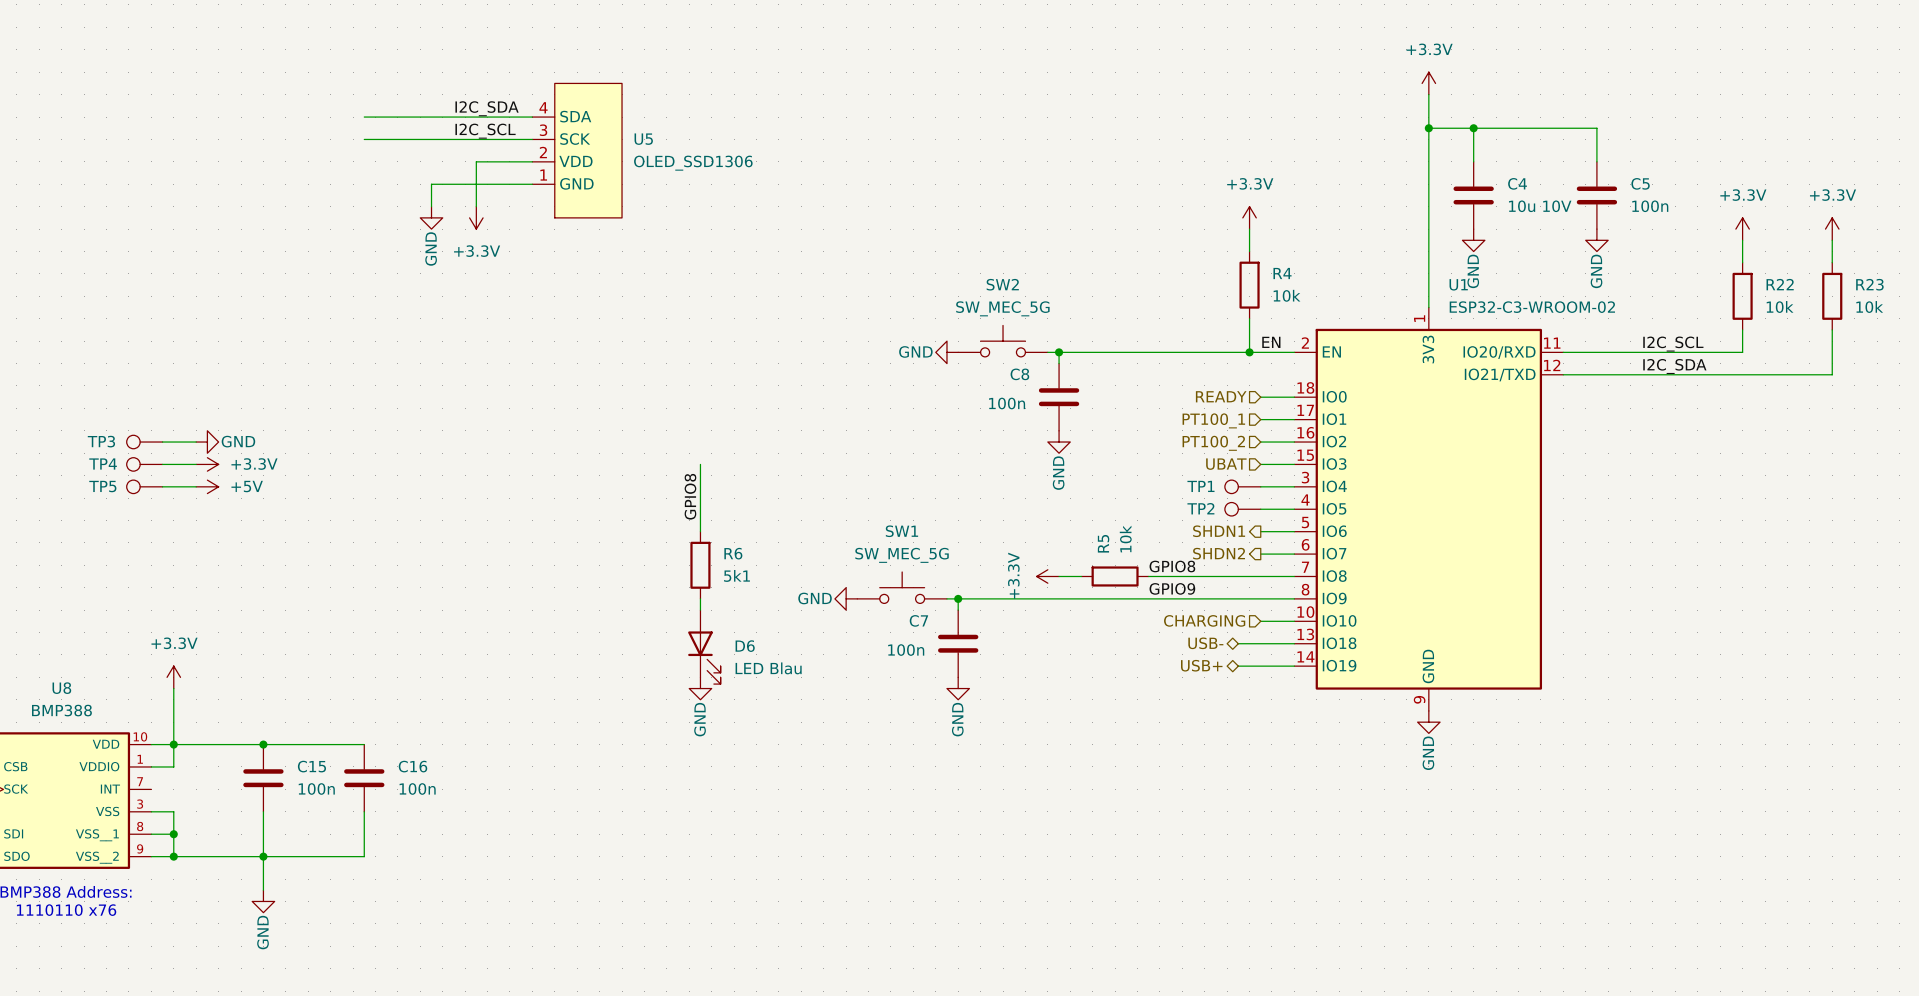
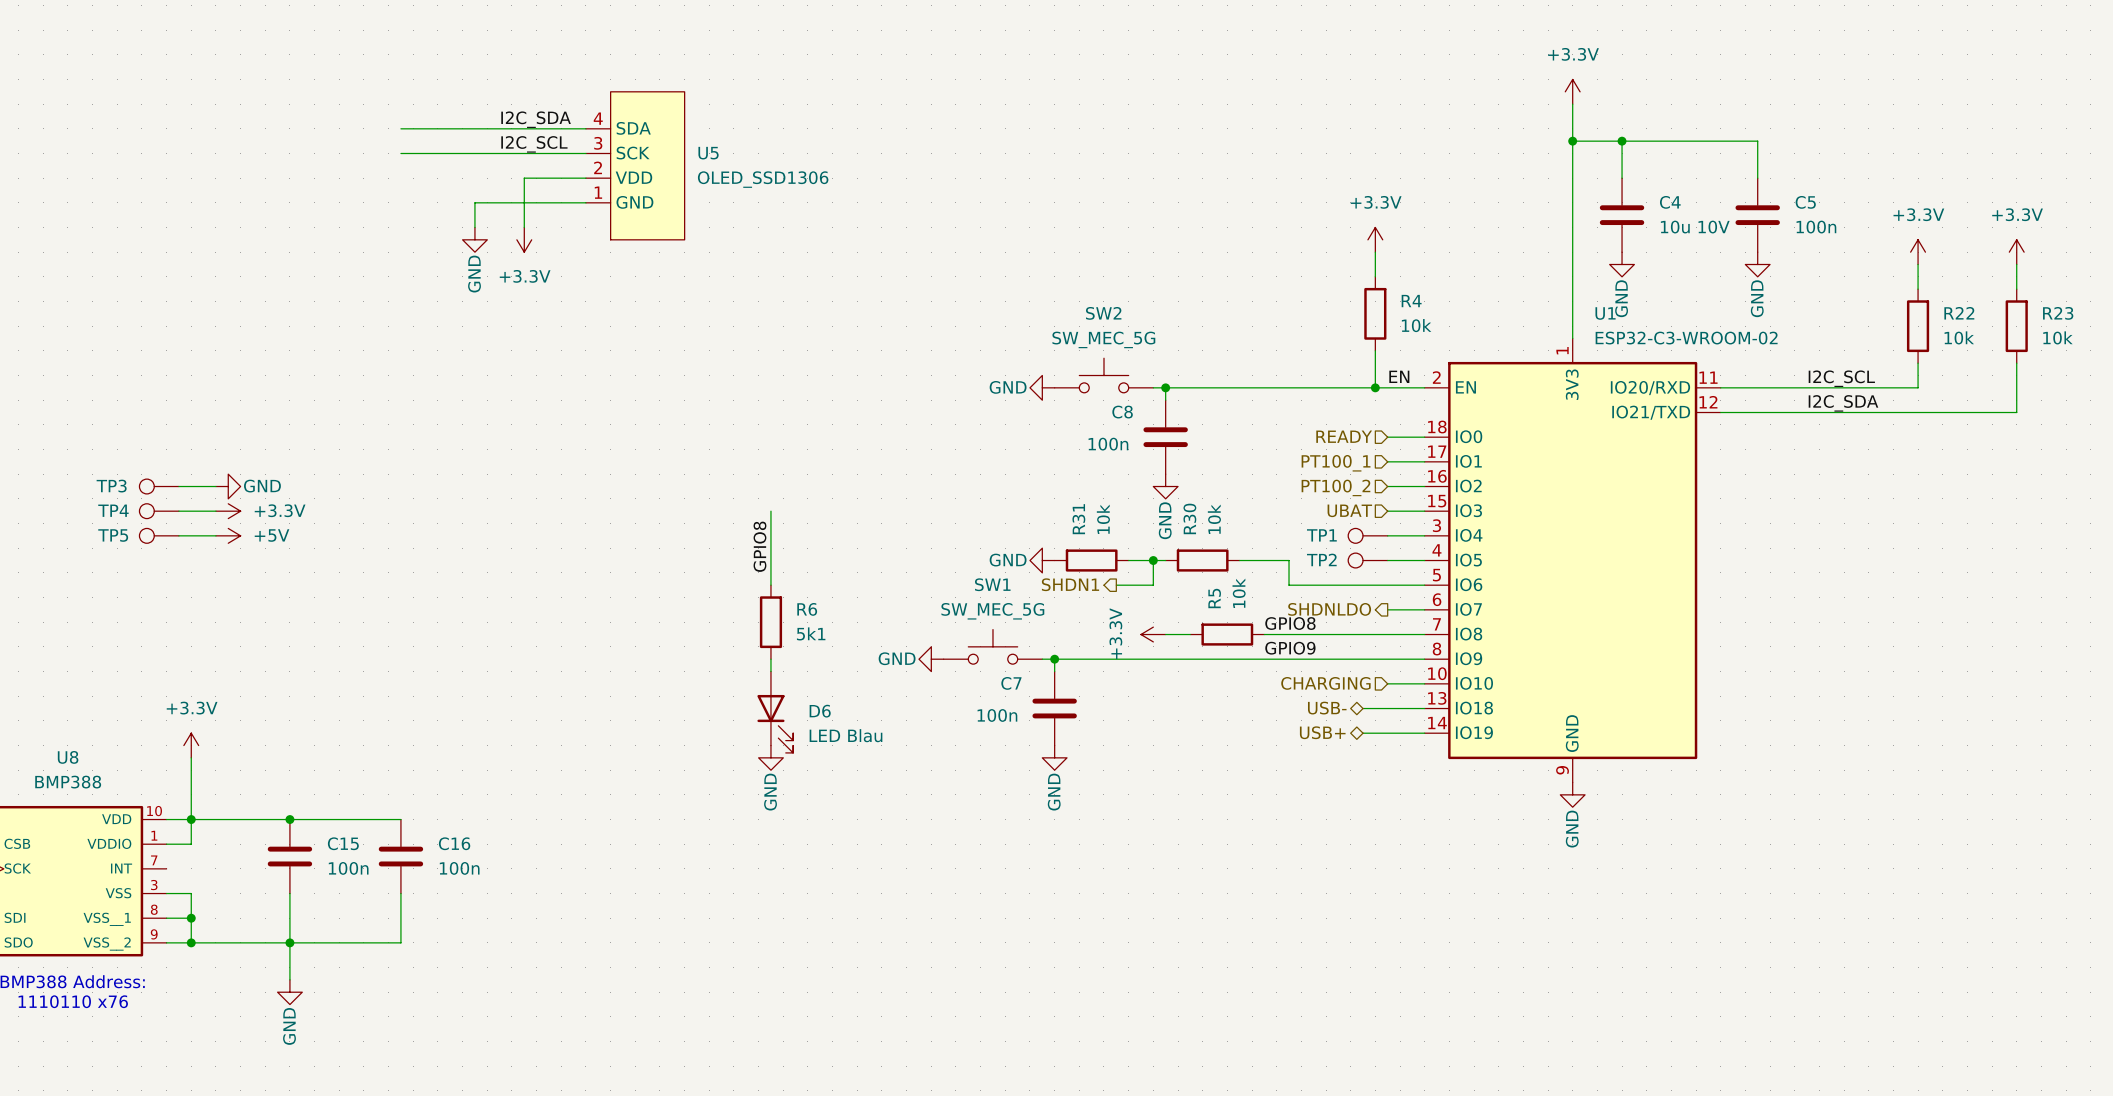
power symbol: none -> GND (1042, 560)
R31: none -> 10k (1091, 560)
wire: none -> (1128, 560) (1165, 560)
wire: none -> (1153, 560) (1153, 585) (1116, 585)
junction: none -> (1153, 560)
R30: none -> 10k (1202, 560)
wire: none -> (1239, 560) (1289, 560) (1289, 585) (1387, 585)
hierarchical label: none -> SHDN1 (1070, 584)
hierarchical label: SHDN1 (1219, 531) -> none
hierarchical label: SHDN2 (1219, 553) -> SHDNLDO (1329, 609)

